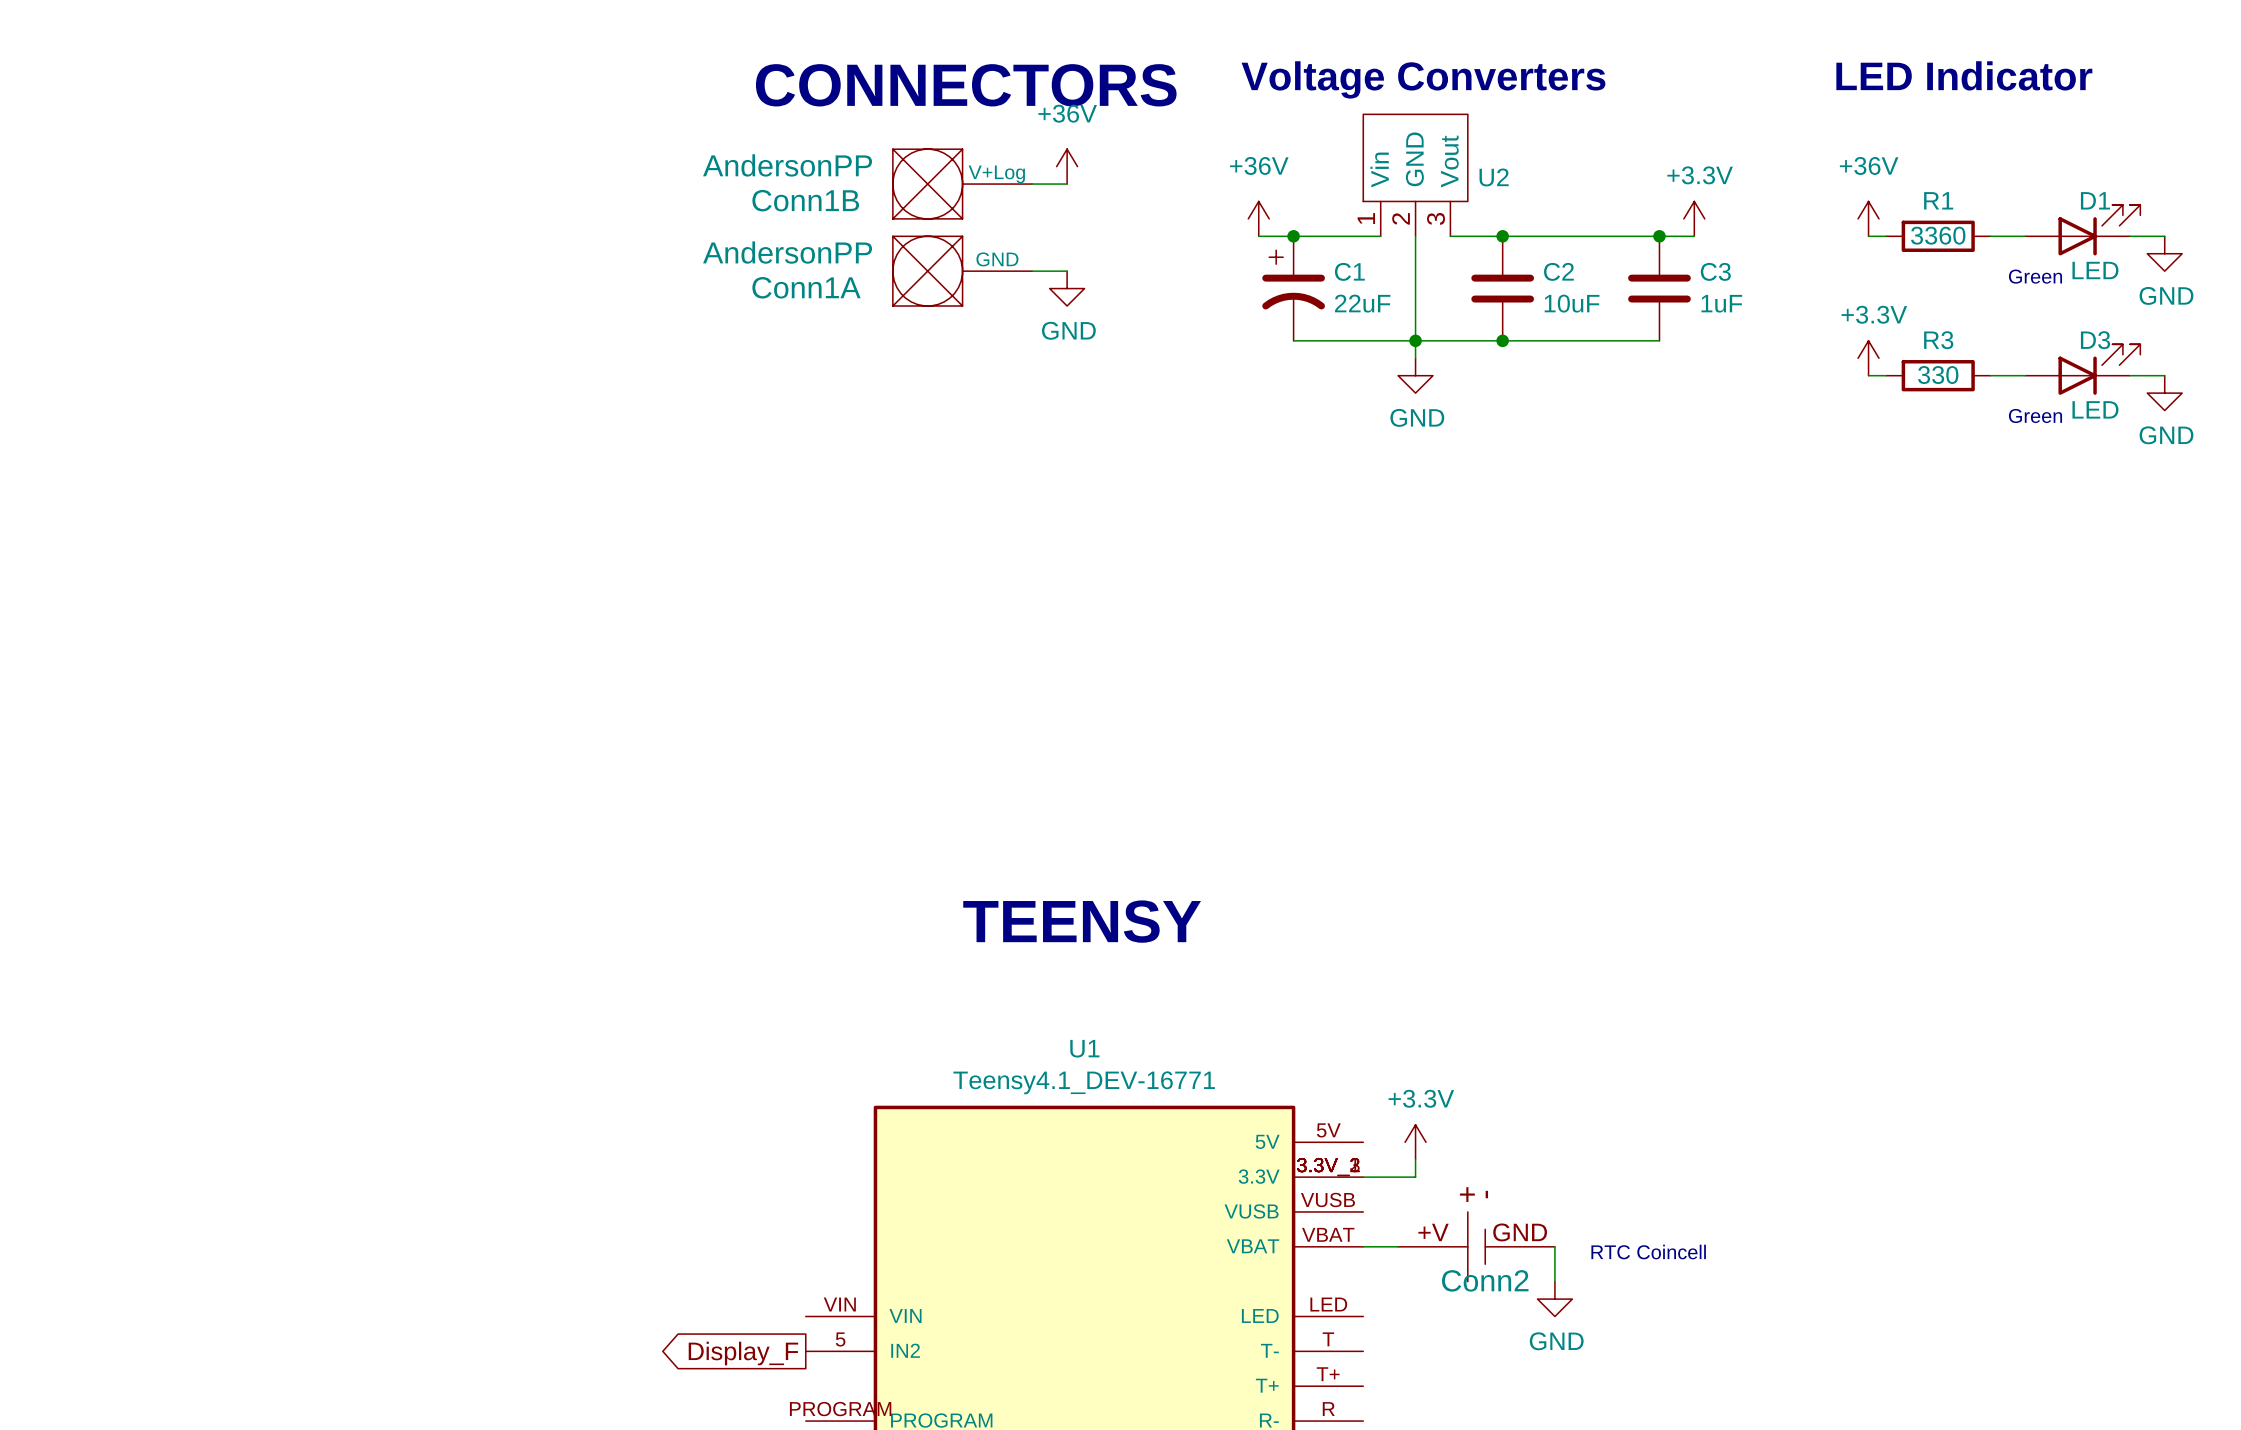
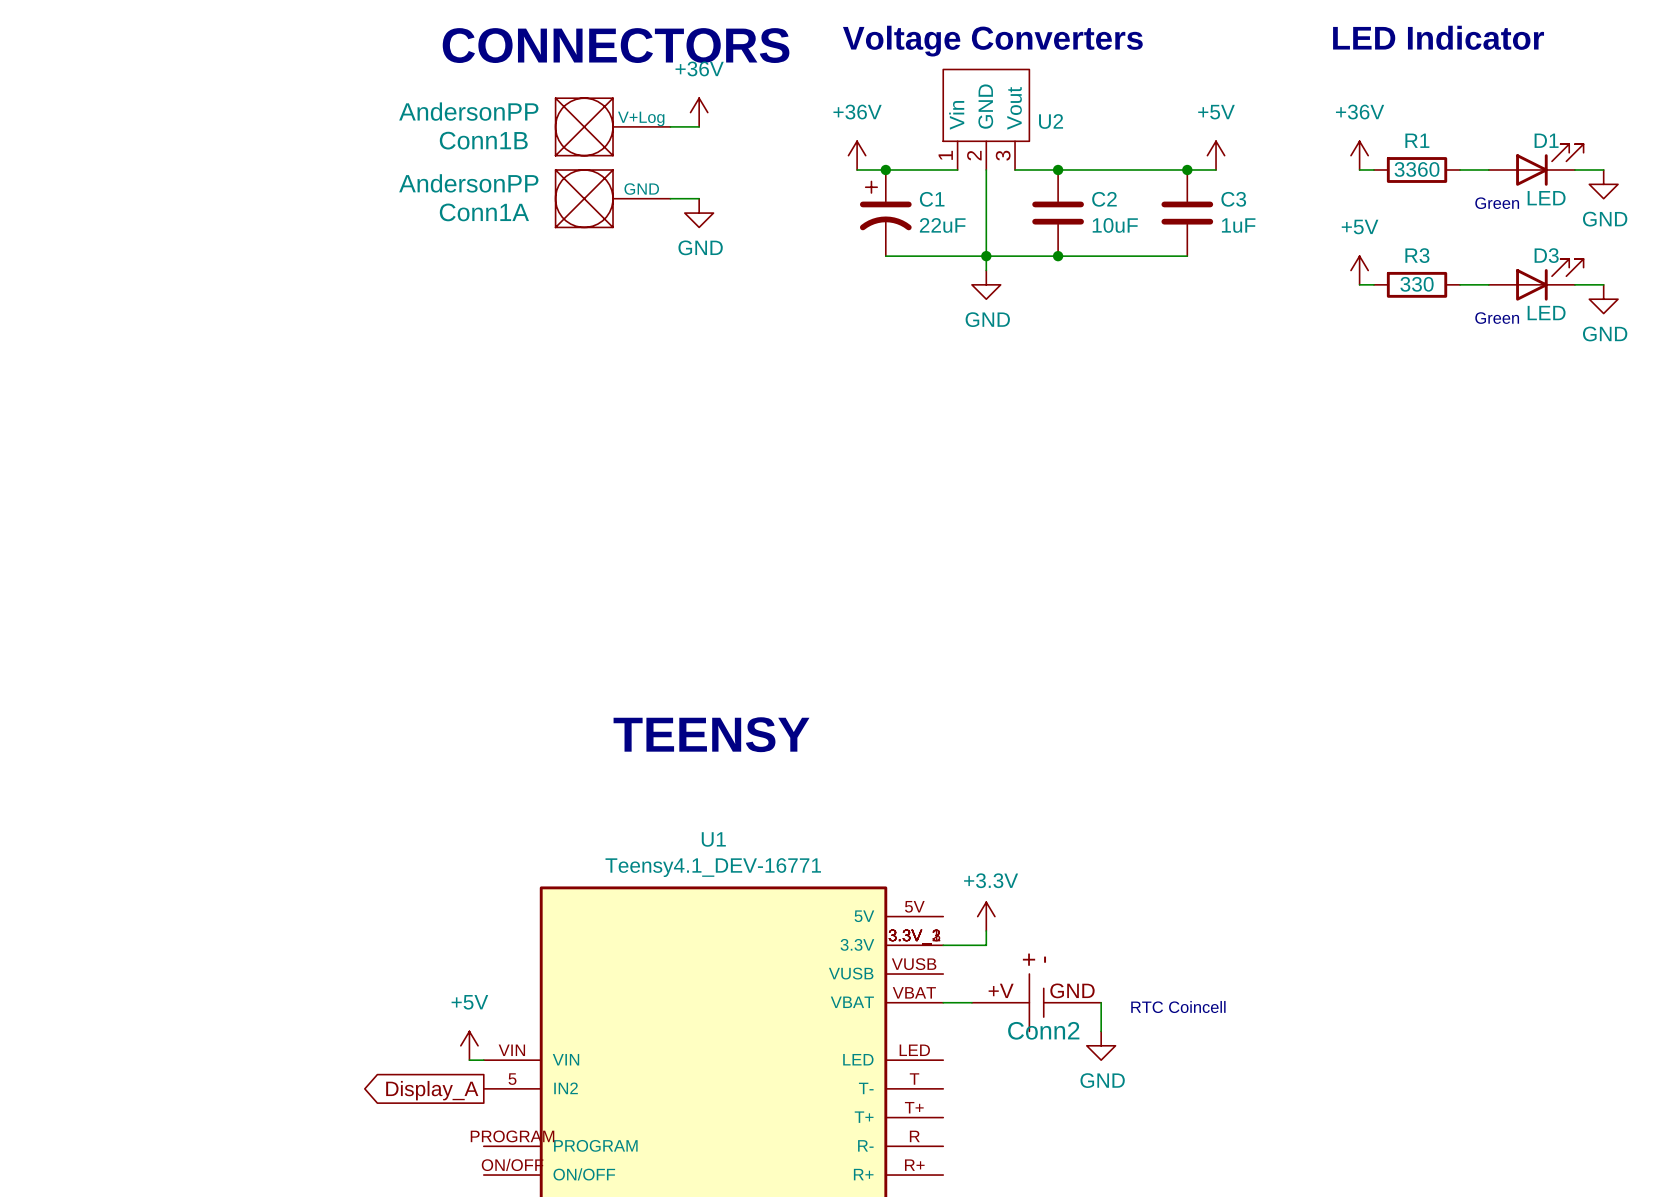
power symbol: +3.3V (1694, 218) -> +5V (1216, 155)
power symbol: +3.3V (1868, 358) -> +5V (1359, 270)
power symbol: none -> +5V (469, 1045)
wire: none -> (469, 1060) (483, 1060)
global label: Display_F (743, 1353) -> Display_A (432, 1090)

